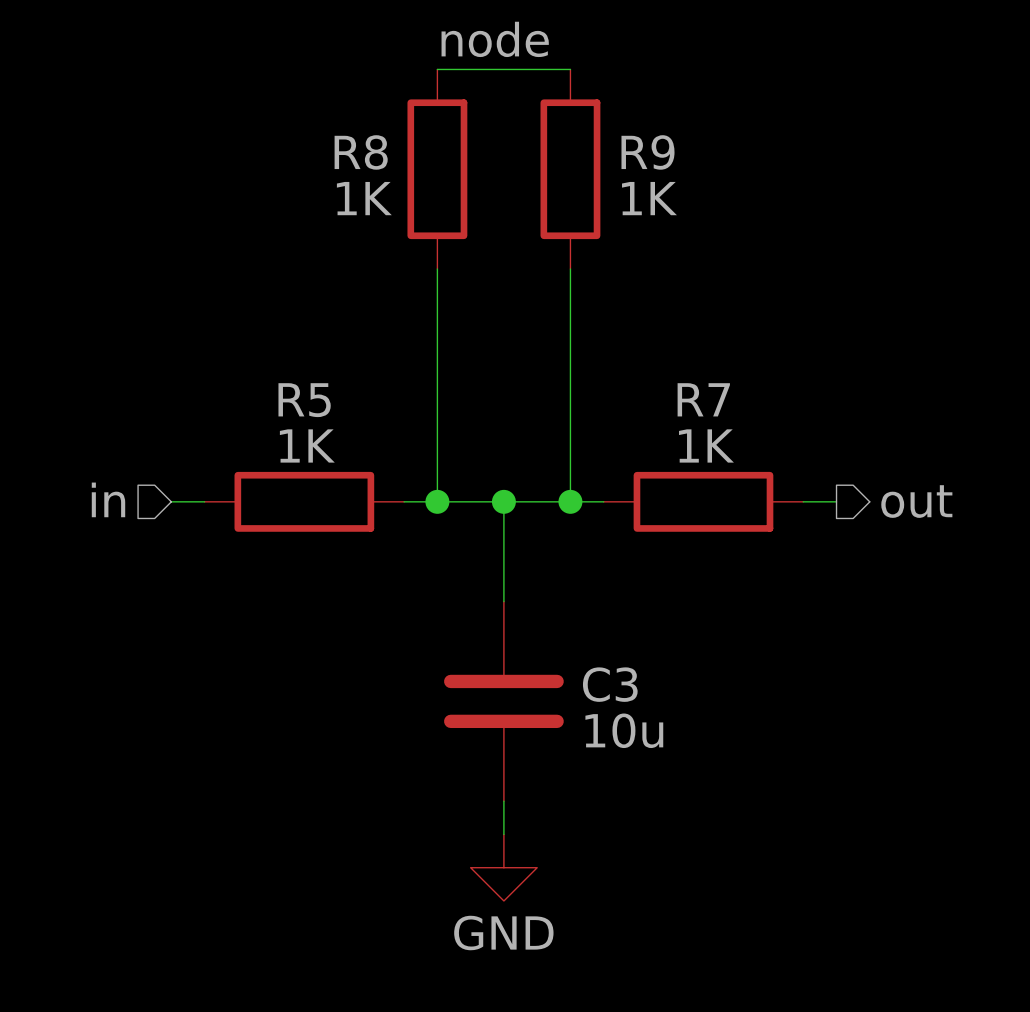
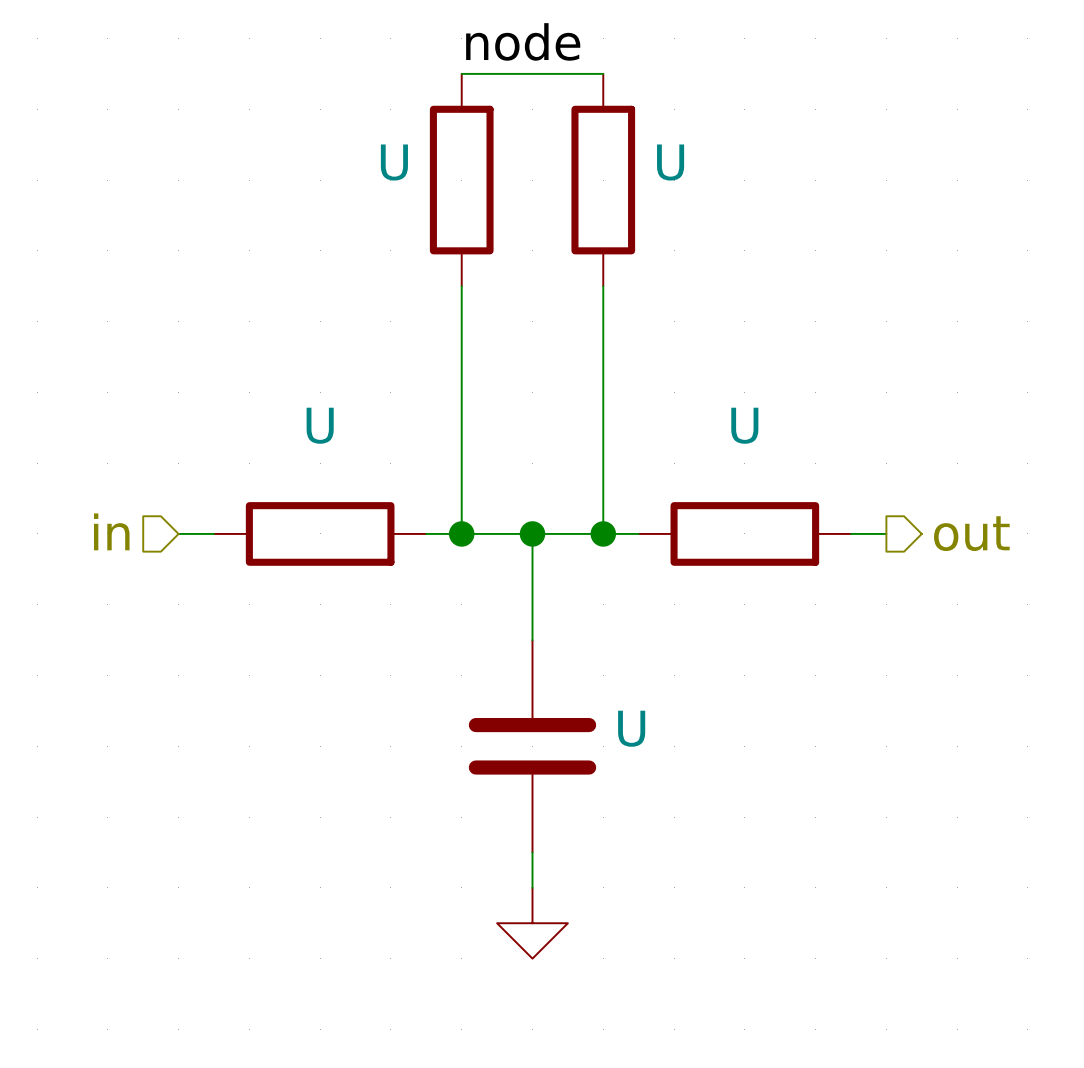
R8 name: R8 (361, 152) -> U (394, 162)
R9 name: R9 (648, 152) -> U (670, 162)
R8 value: 1K (364, 198) -> none
R9 value: 1K (649, 198) -> none
R7 name: R7 (703, 399) -> U (744, 425)
R5 name: R5 (304, 400) -> U (320, 425)
R5 value: 1K (307, 445) -> none
R7 value: 1K (706, 445) -> none
C3 name: C3 (610, 684) -> U (631, 728)
C3 value: 10u (624, 730) -> none
power symbol text: GND (503, 933) -> none

